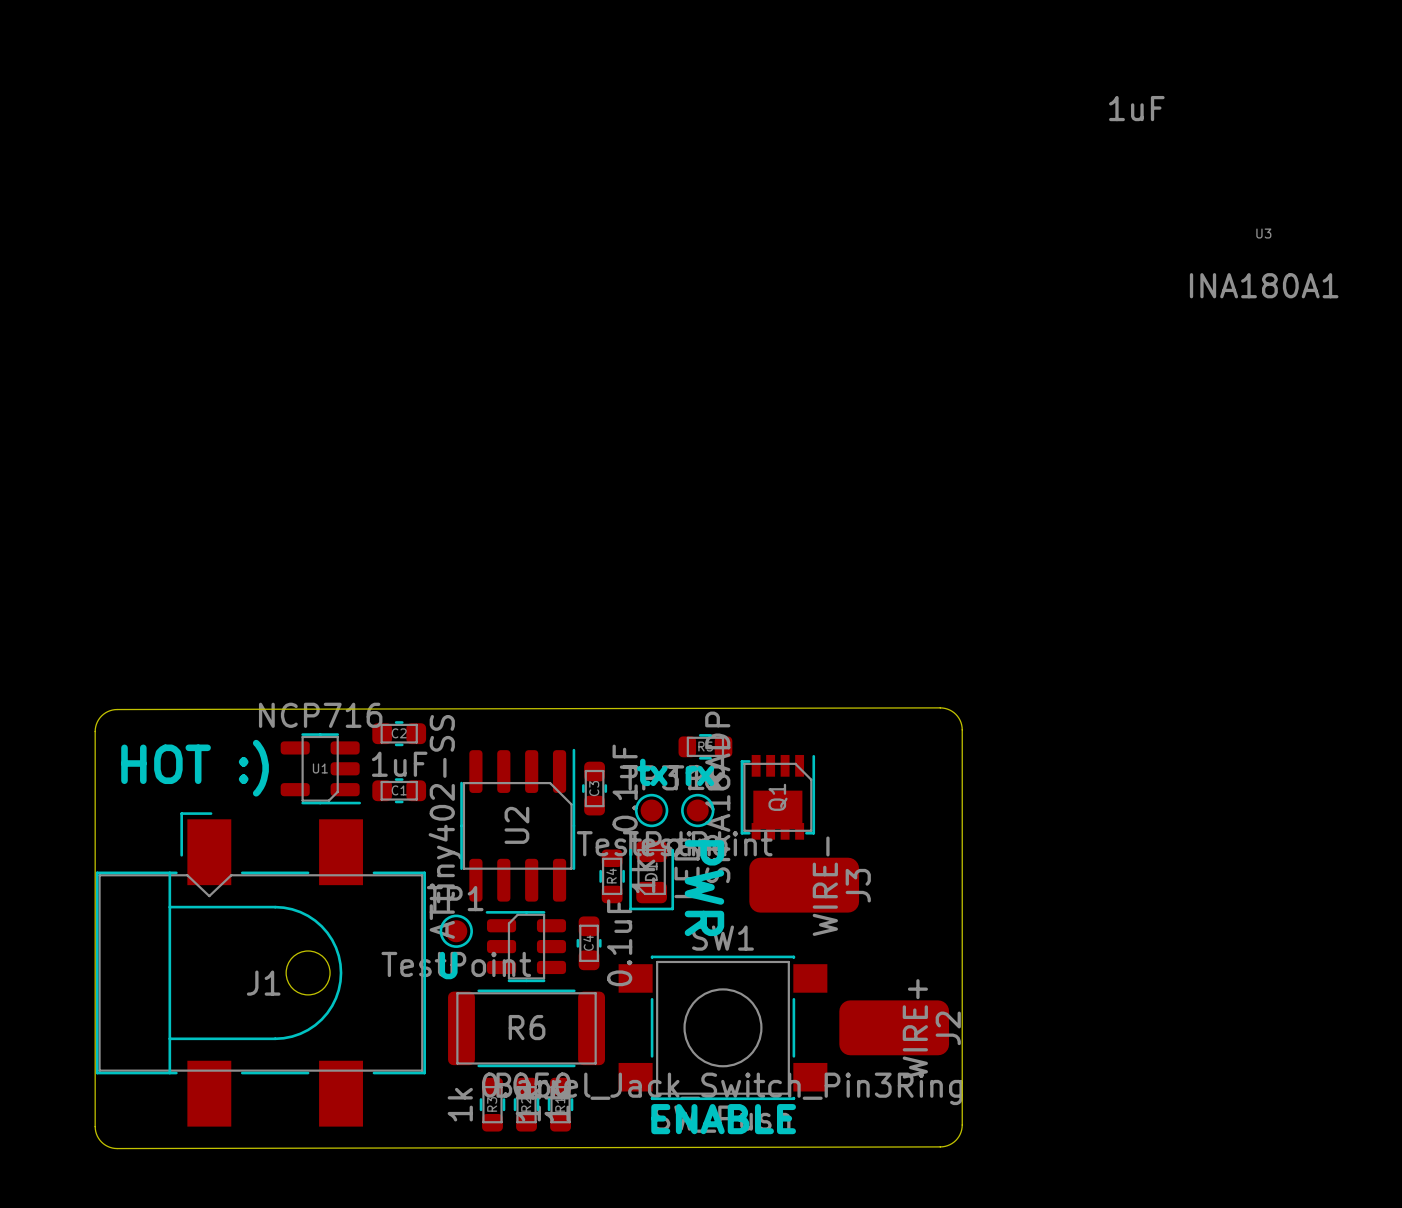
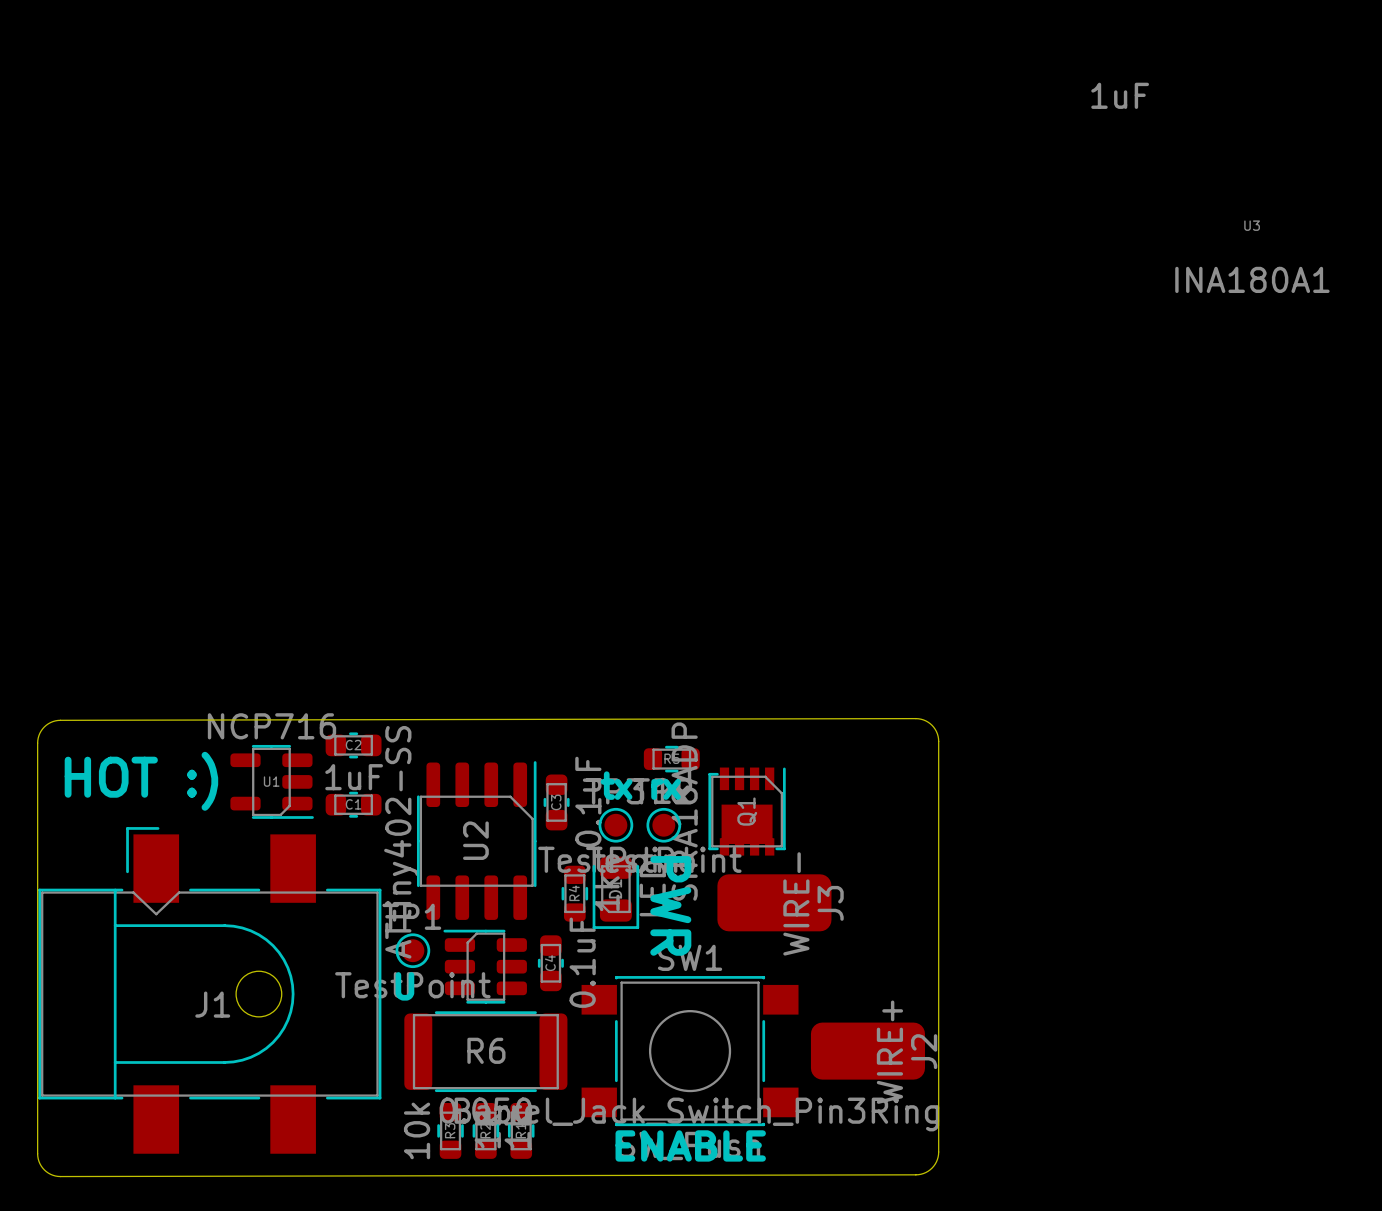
R3 value: 1k (460, 1104) -> 10k (417, 1130)

